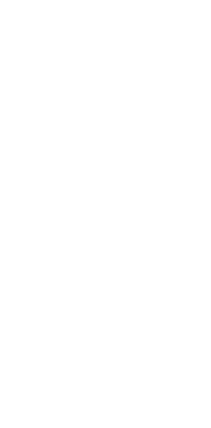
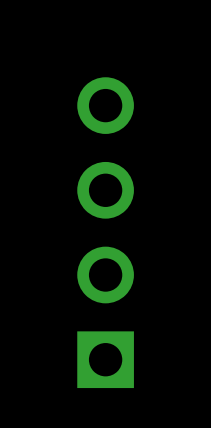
part: none -> (105, 232)

